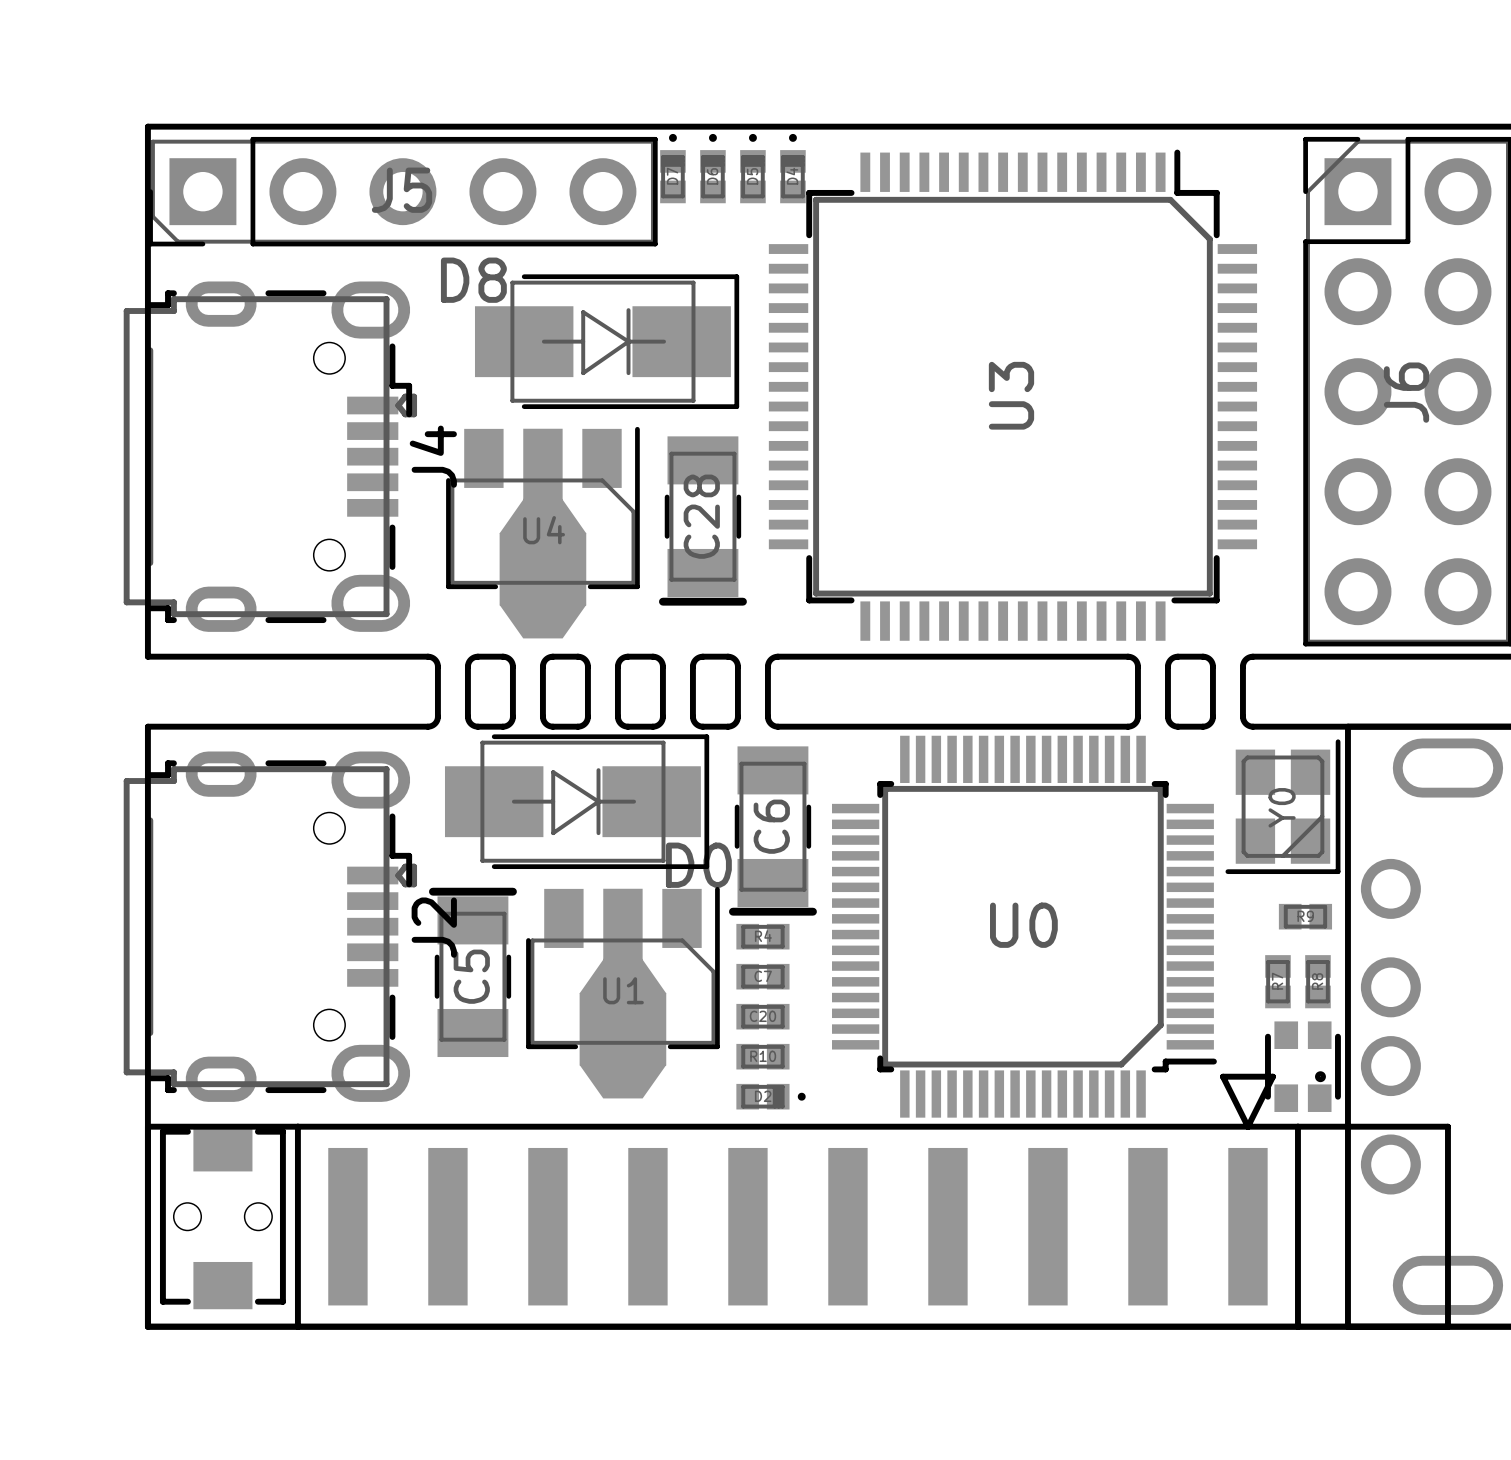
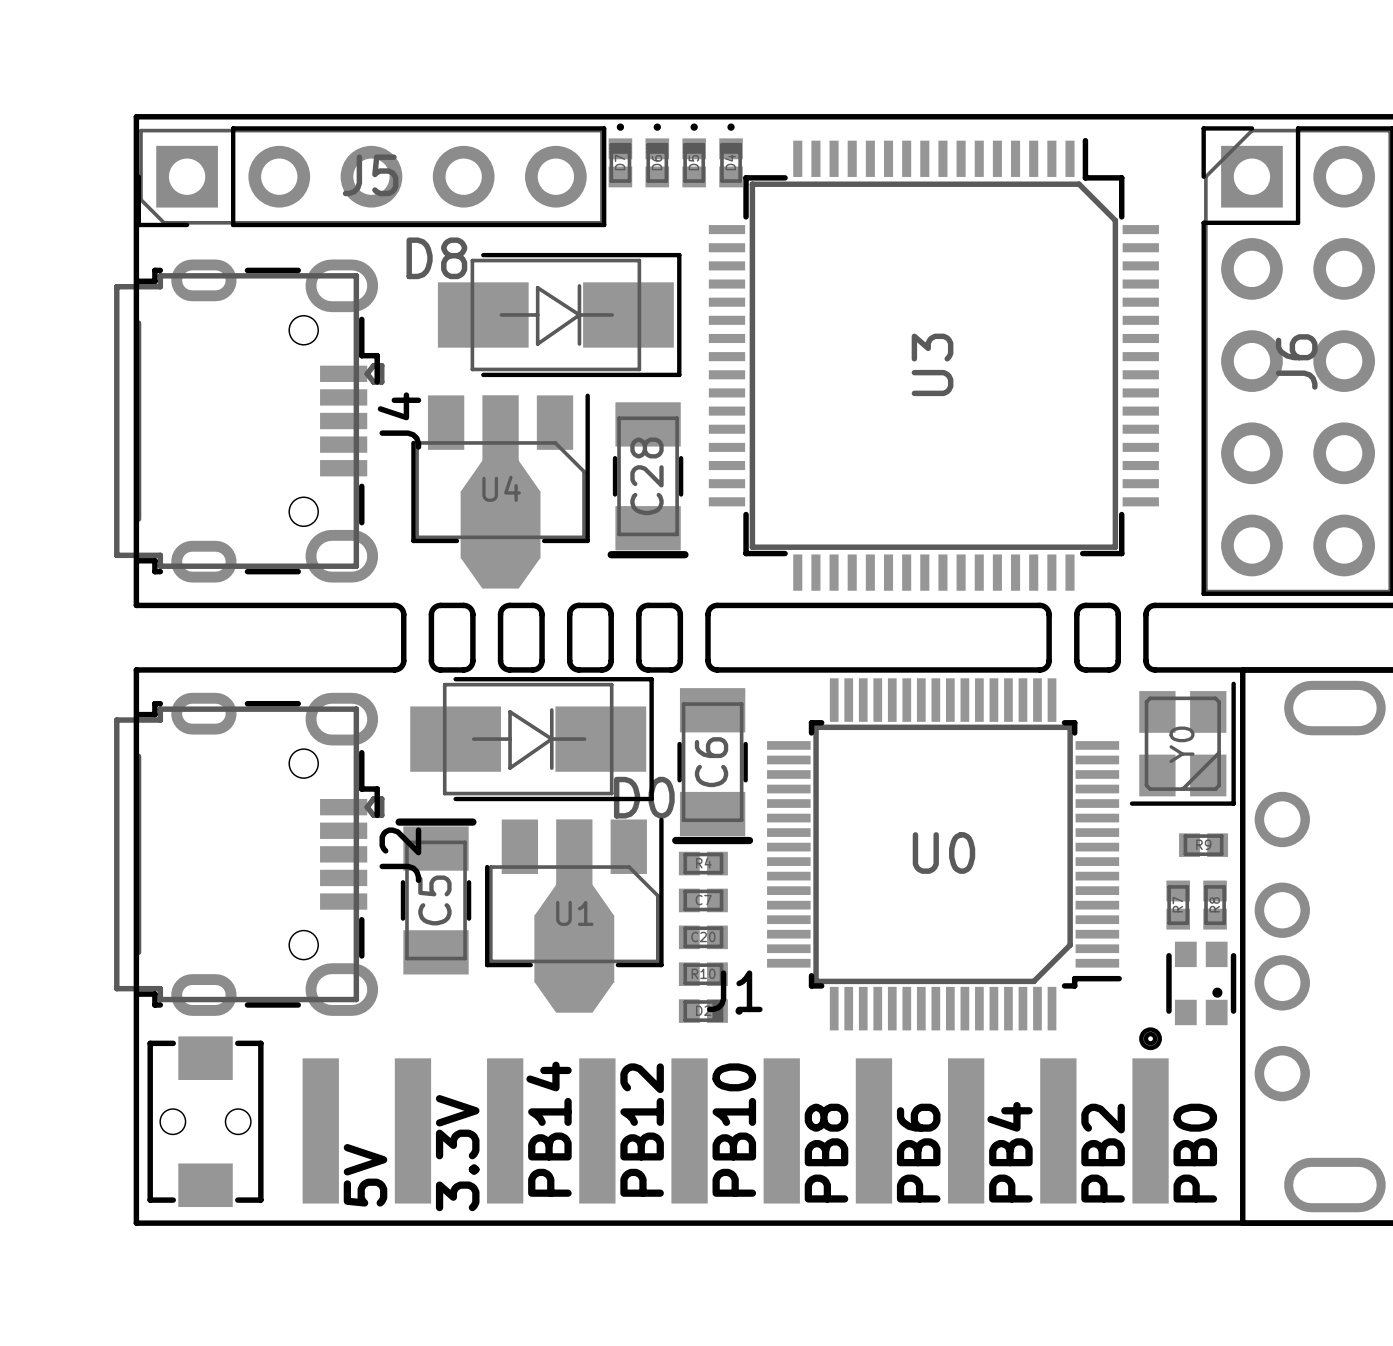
part: (797, 1201) -> none
J1: none -> (735, 1115)
text: none -> PB14 (549, 1129)
text: none -> PB12 (642, 1130)
text: none -> PB10 (734, 1130)
text: none -> PB4 (1010, 1152)
text: none -> 3.3V (457, 1153)
text: none -> PB8 (826, 1153)
text: none -> PB6 (918, 1153)
text: none -> PB2 (1103, 1153)
text: none -> PB0 (1195, 1153)
text: none -> 5V (365, 1175)

